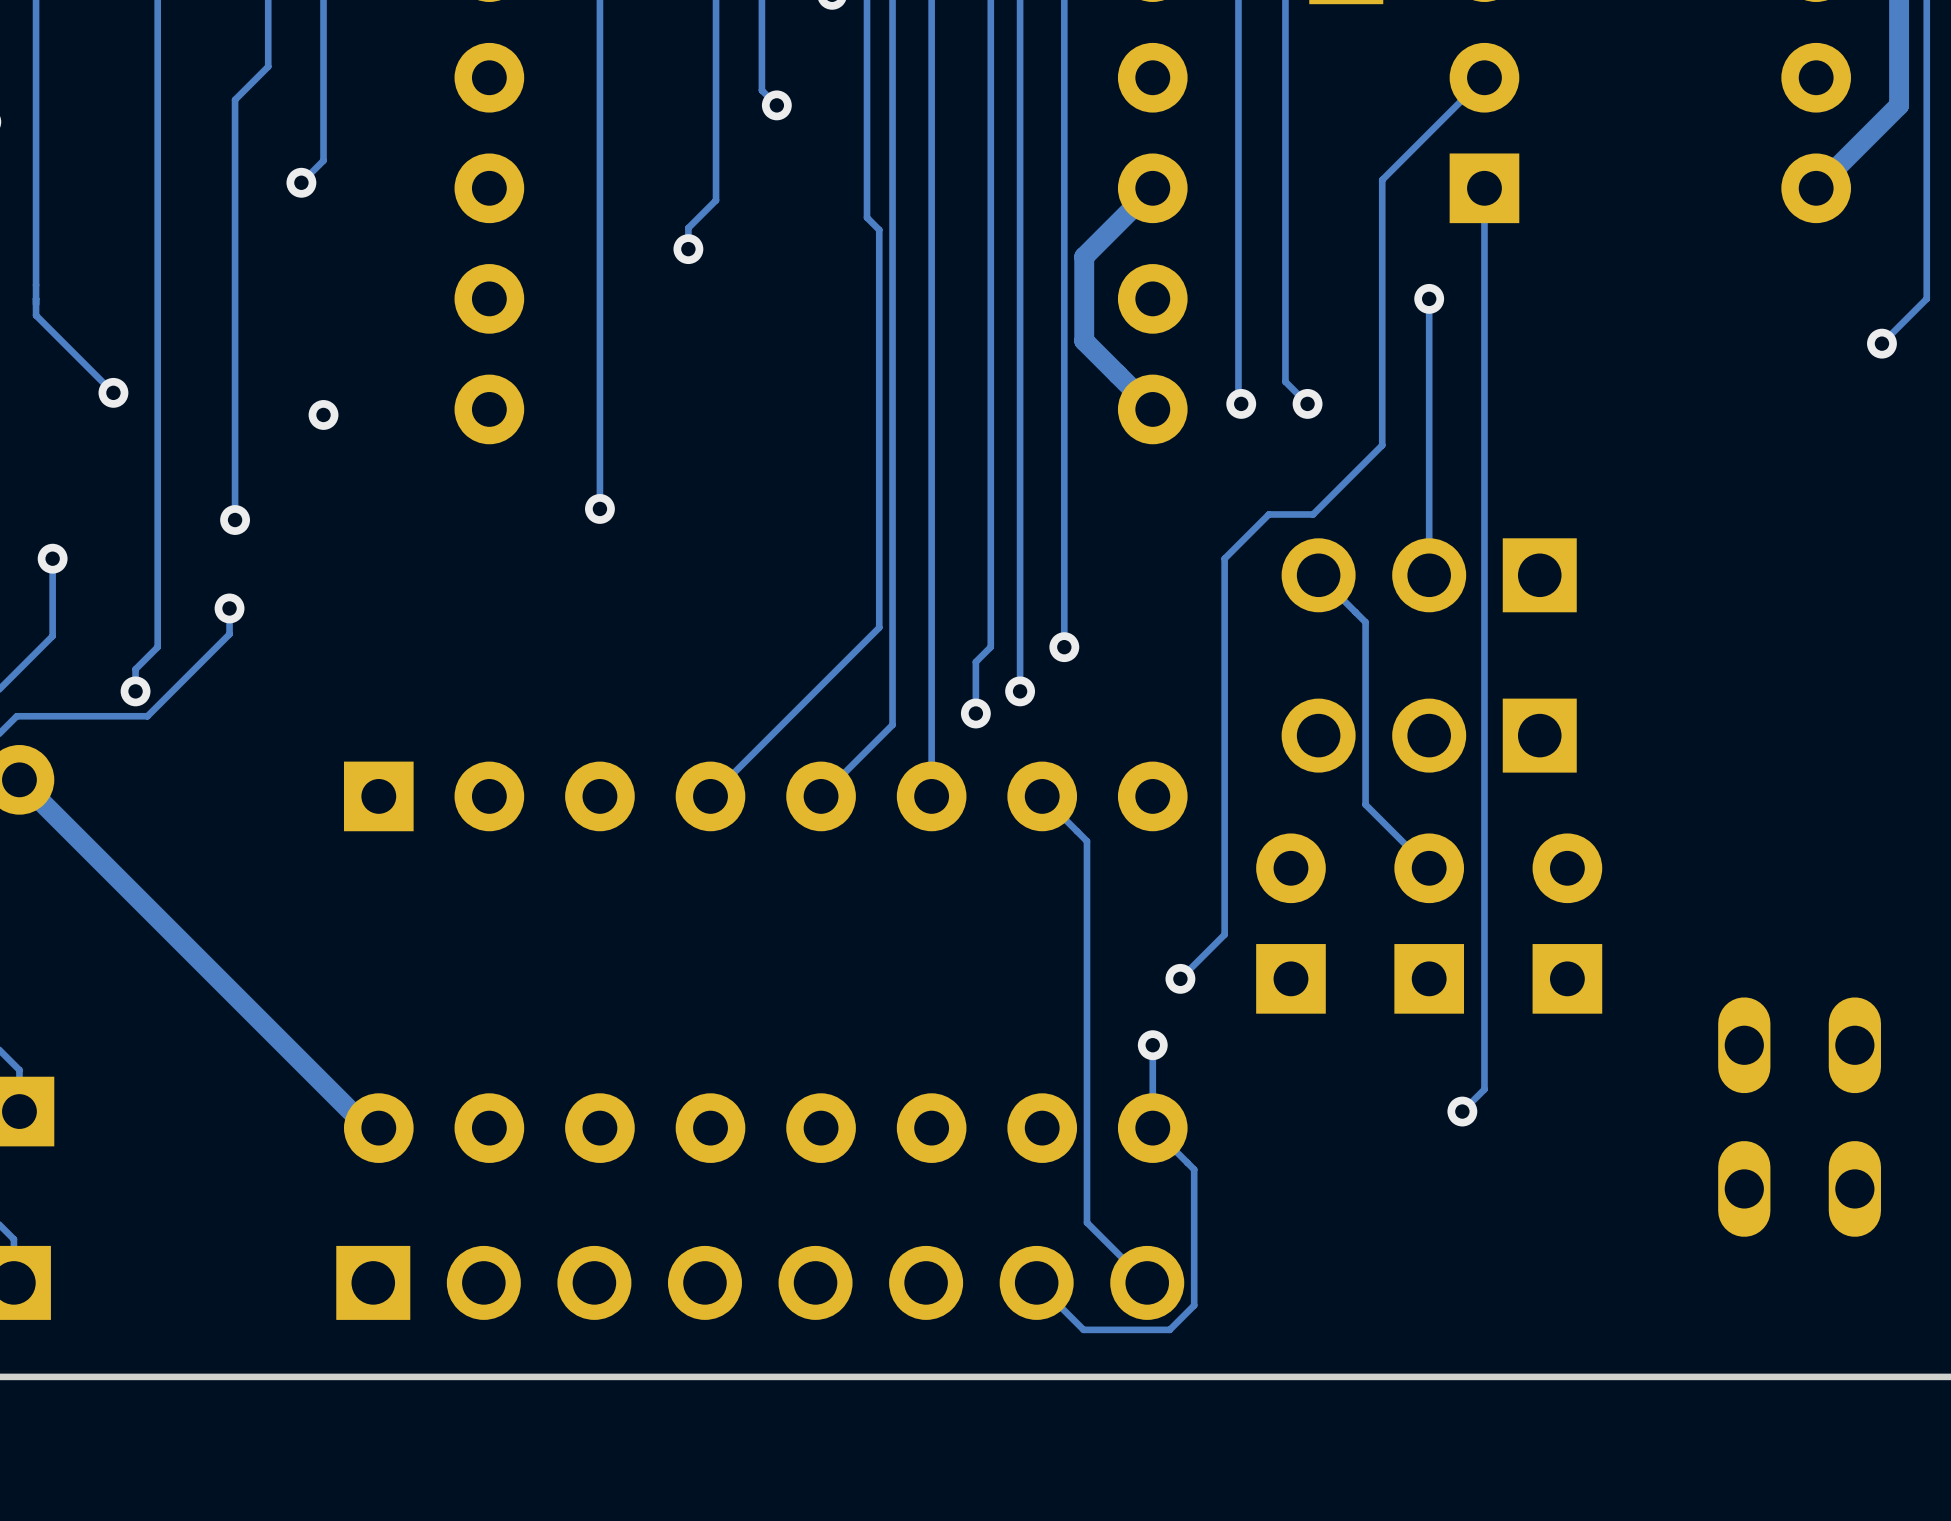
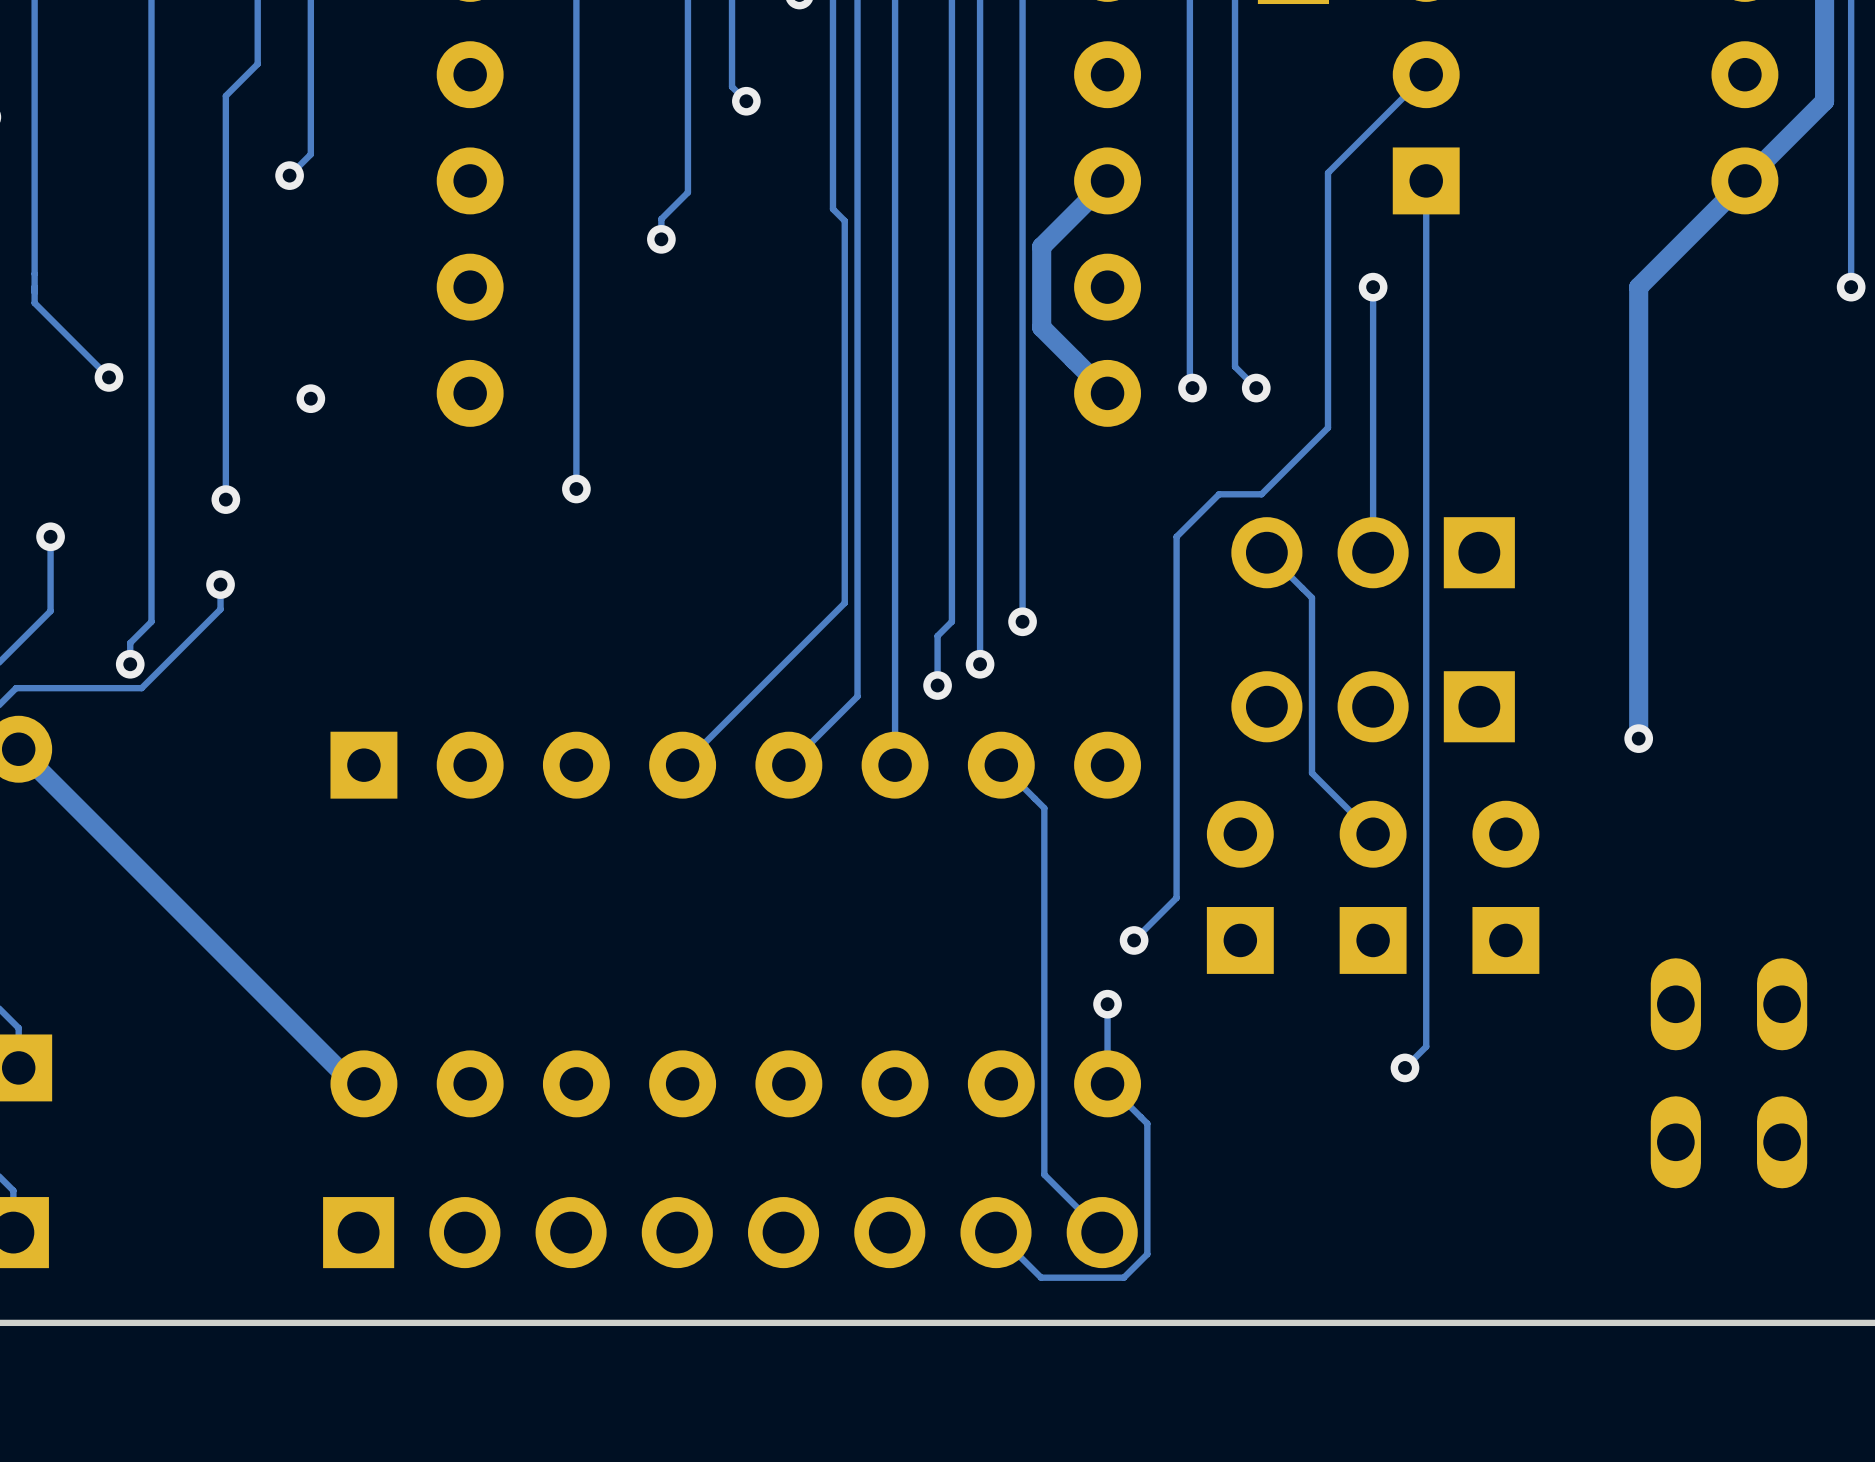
track: none -> (1744, 180) (1638, 287) (1638, 738)
track: (1926, 298) (1881, 343) -> none
via position: (1881, 343) -> (1851, 287)
via: none -> (1638, 738)

